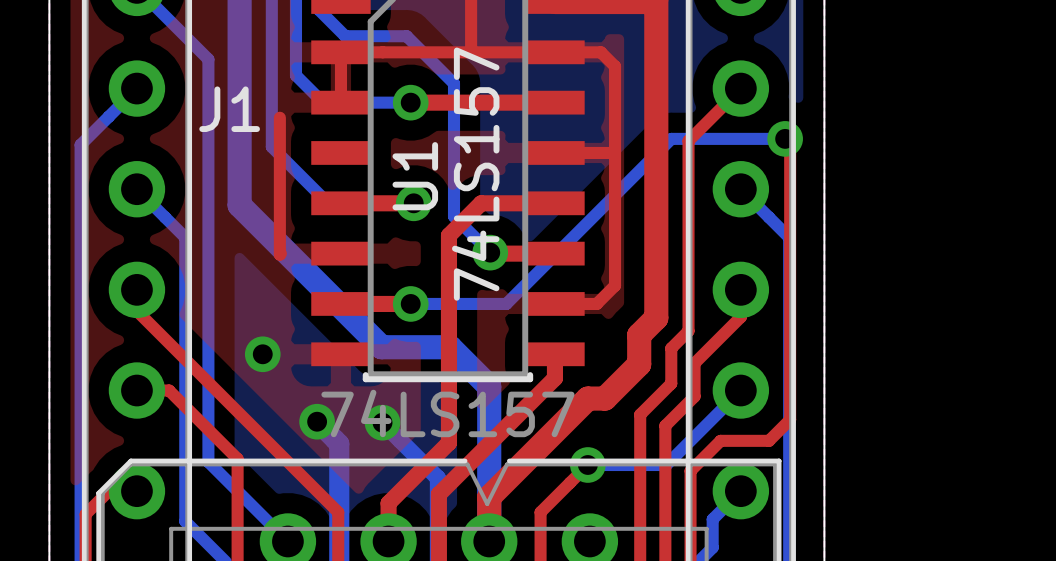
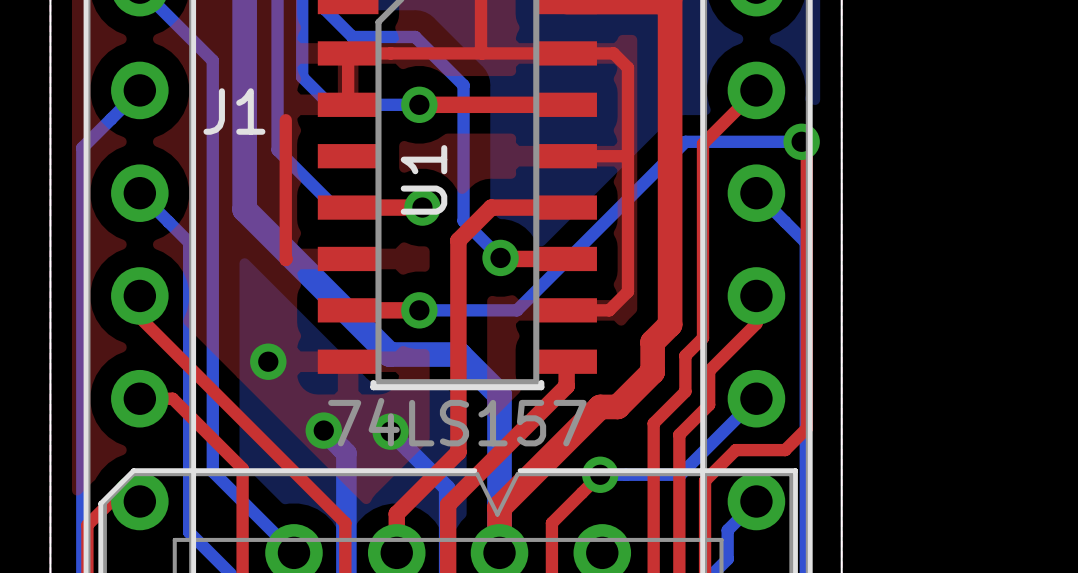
text: 74LS157 (475, 174) -> none

